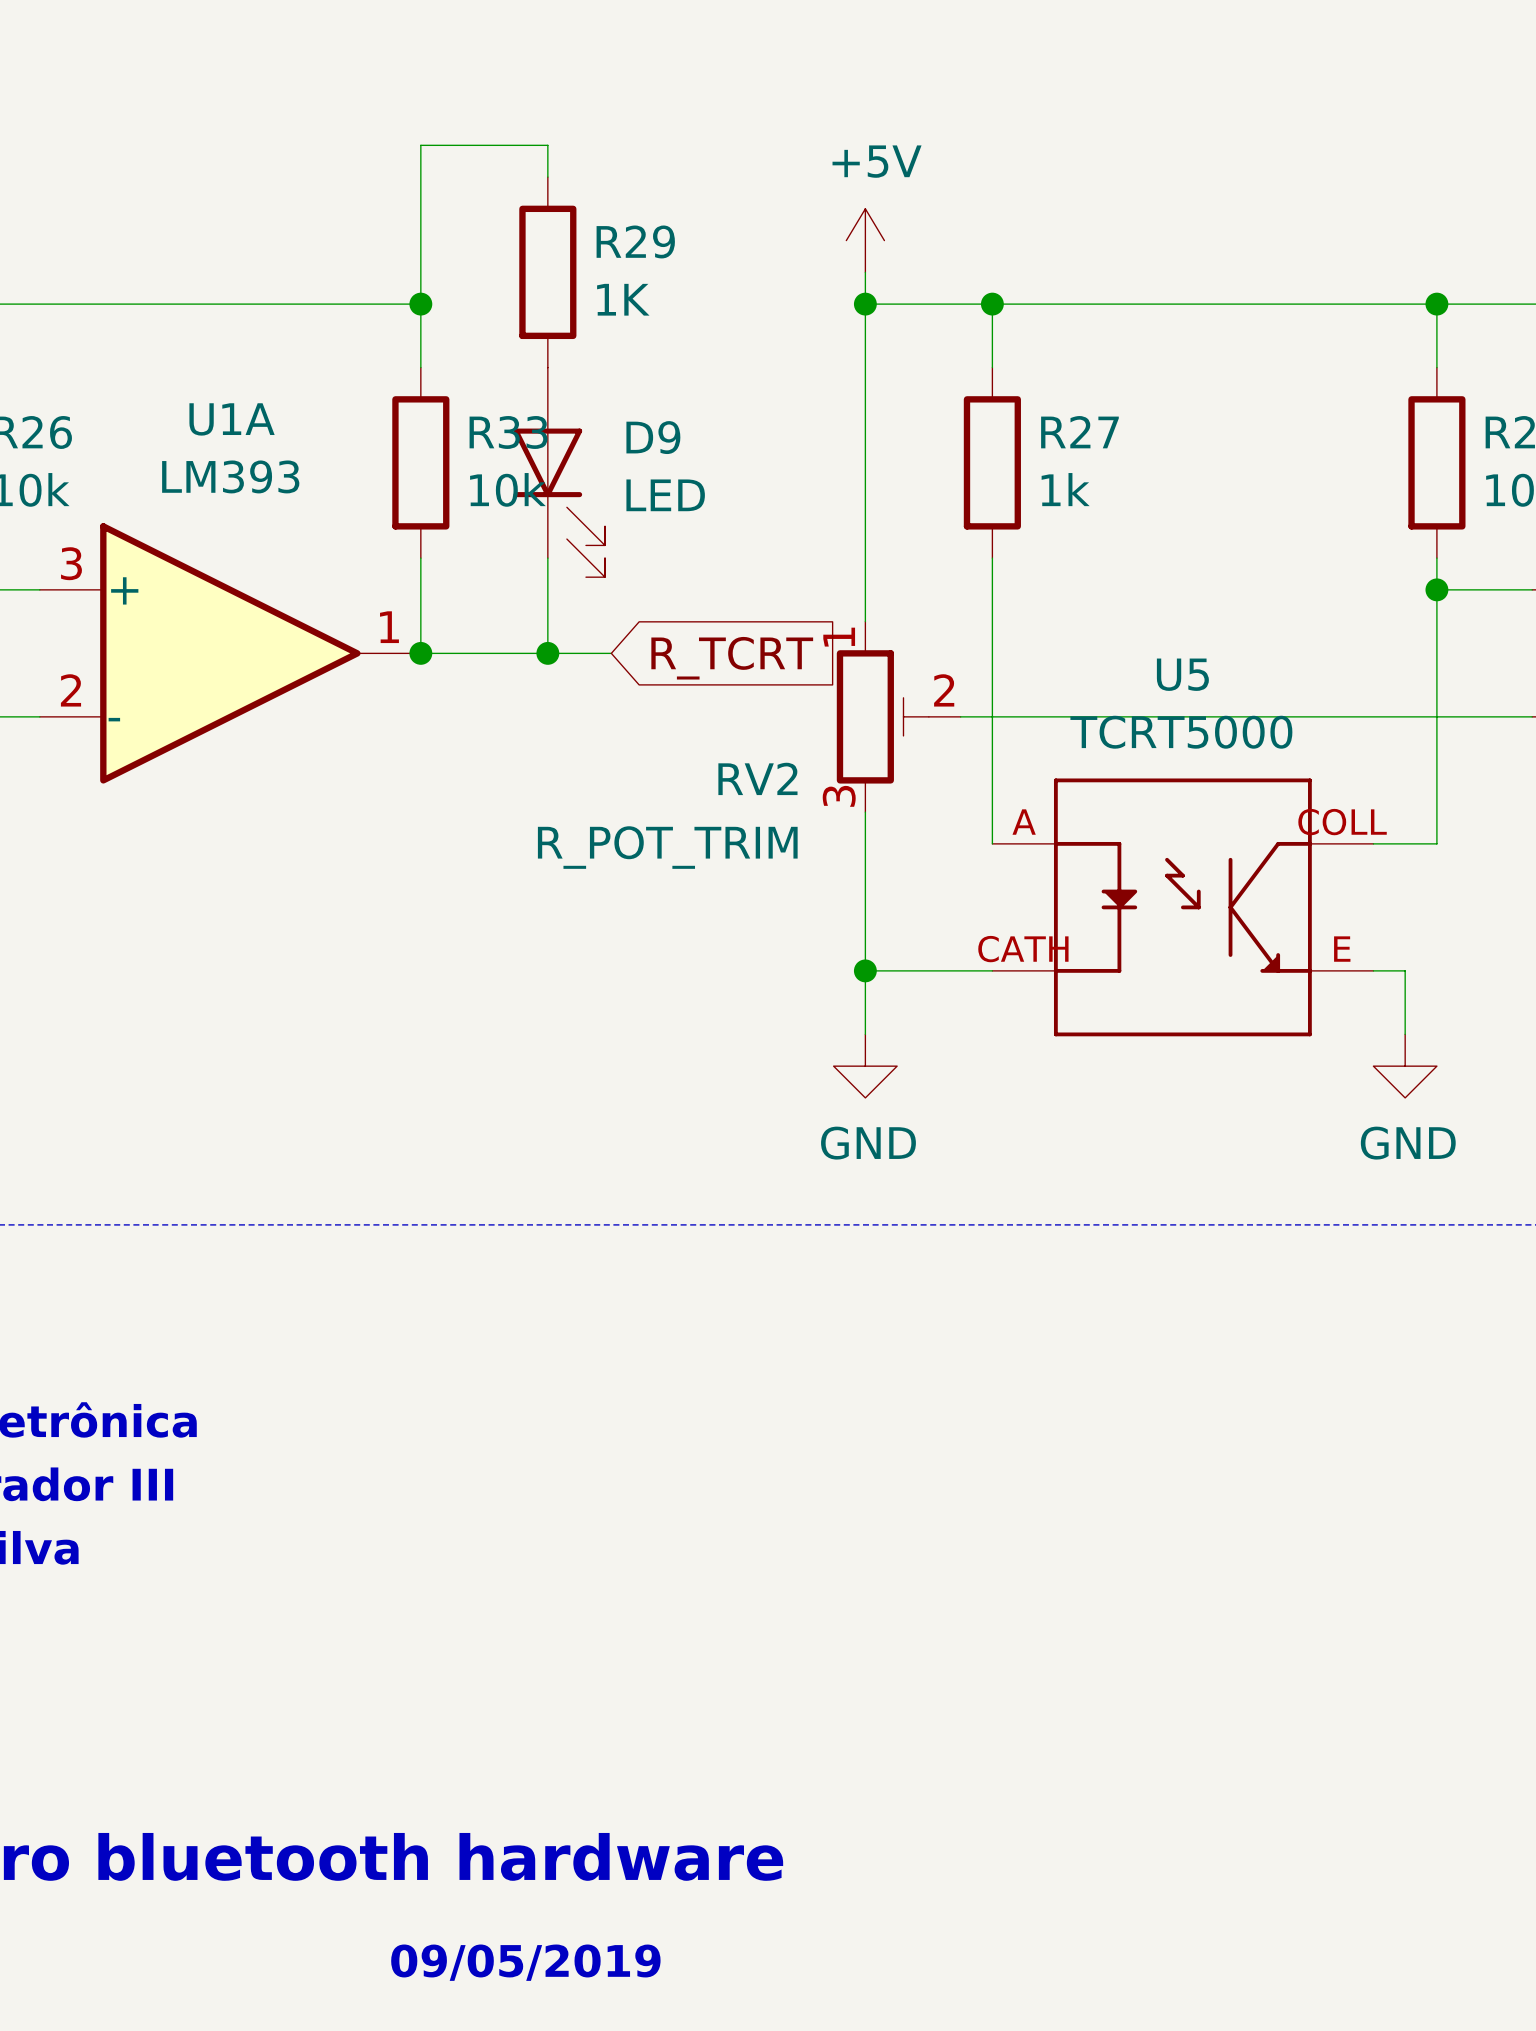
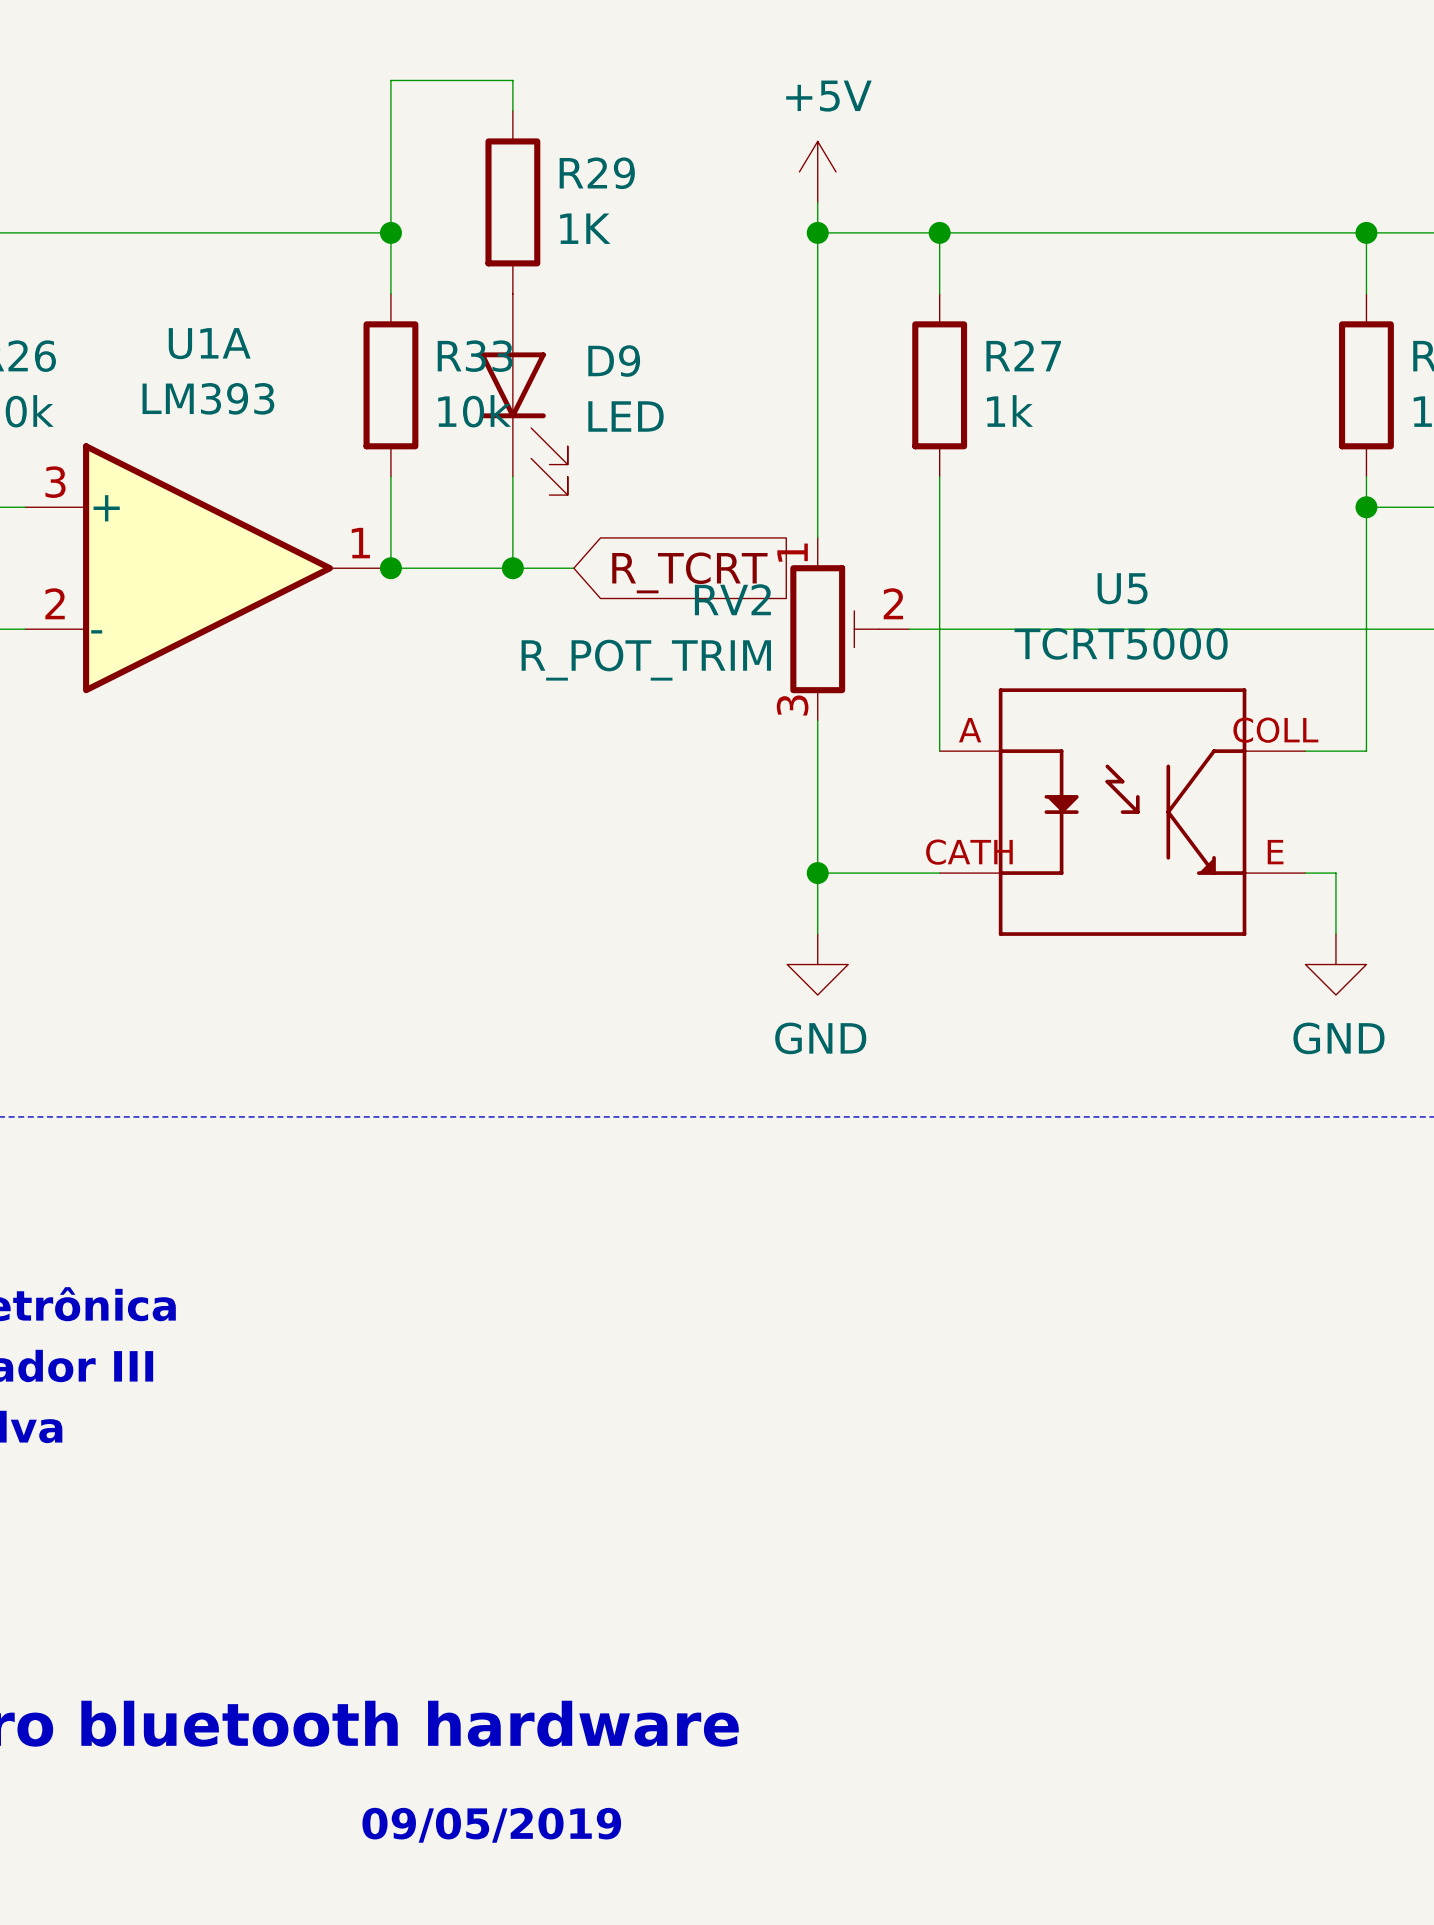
RV2 name position: RV2 (757, 778) -> RV2 (732, 599)
RV2 value position: R_POT_TRIM (667, 847) -> R_POT_TRIM (646, 660)

